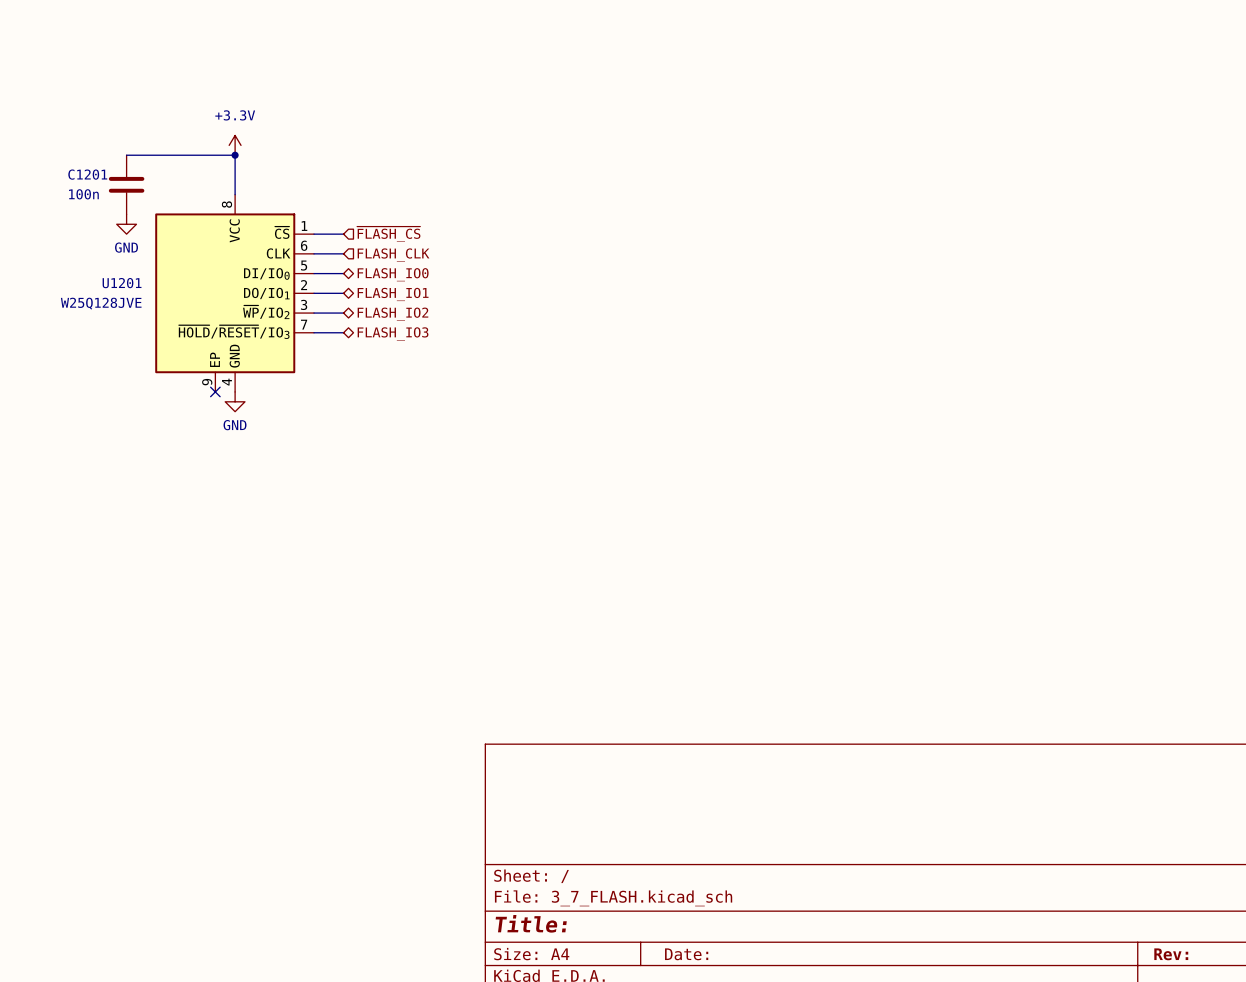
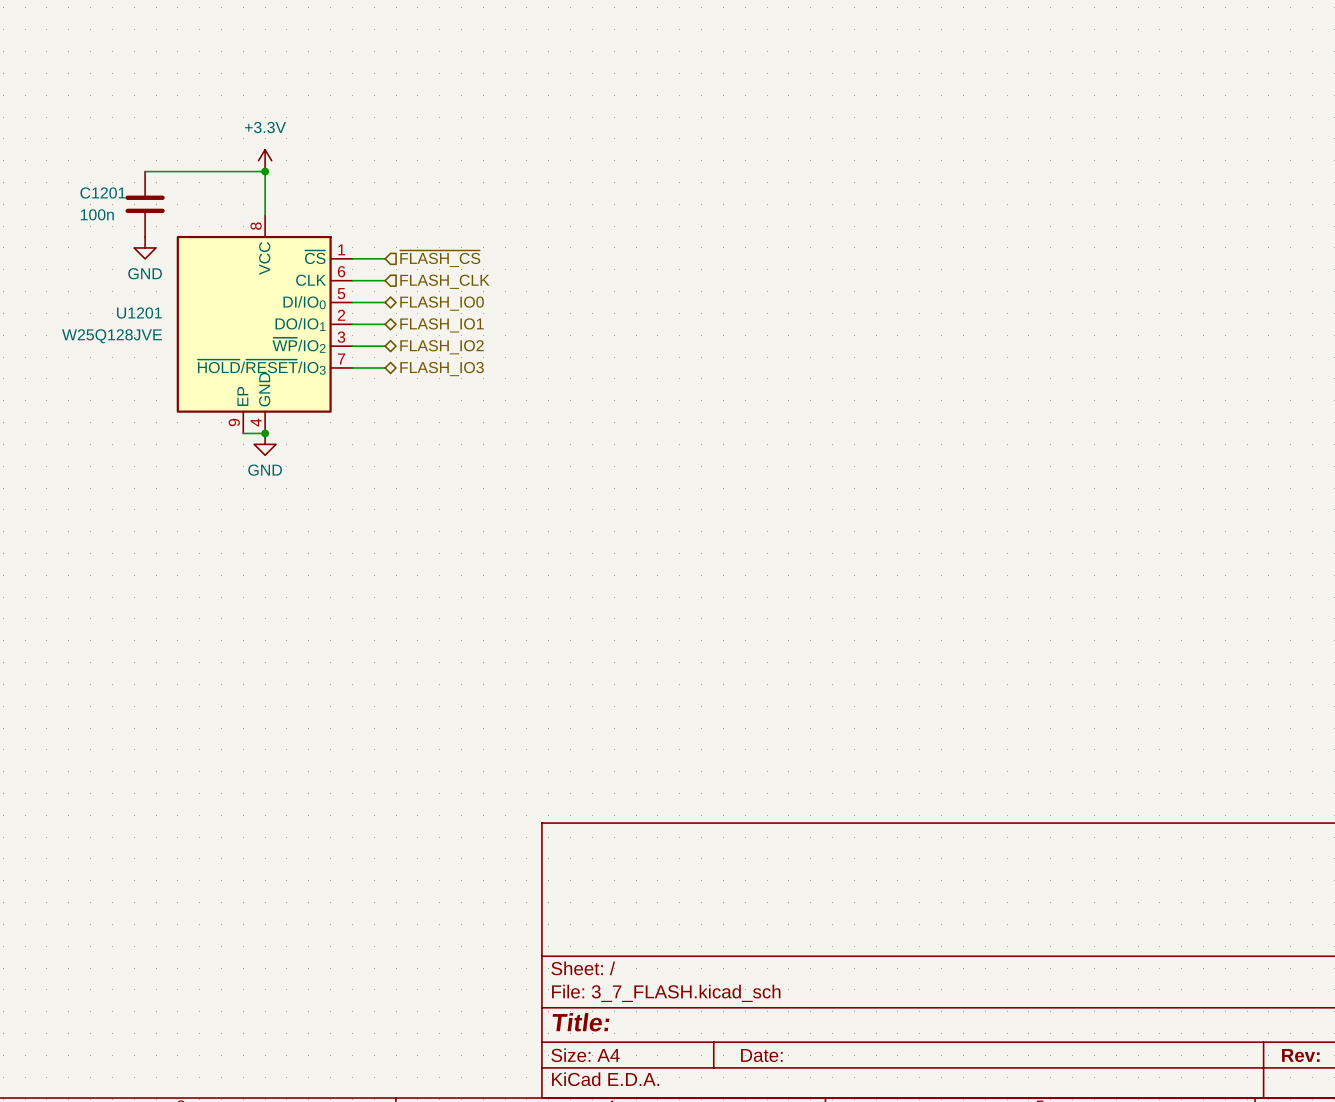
wire: none -> (243, 433) (265, 433)
no-connect mark: (215, 391) -> none
junction: none -> (265, 433)

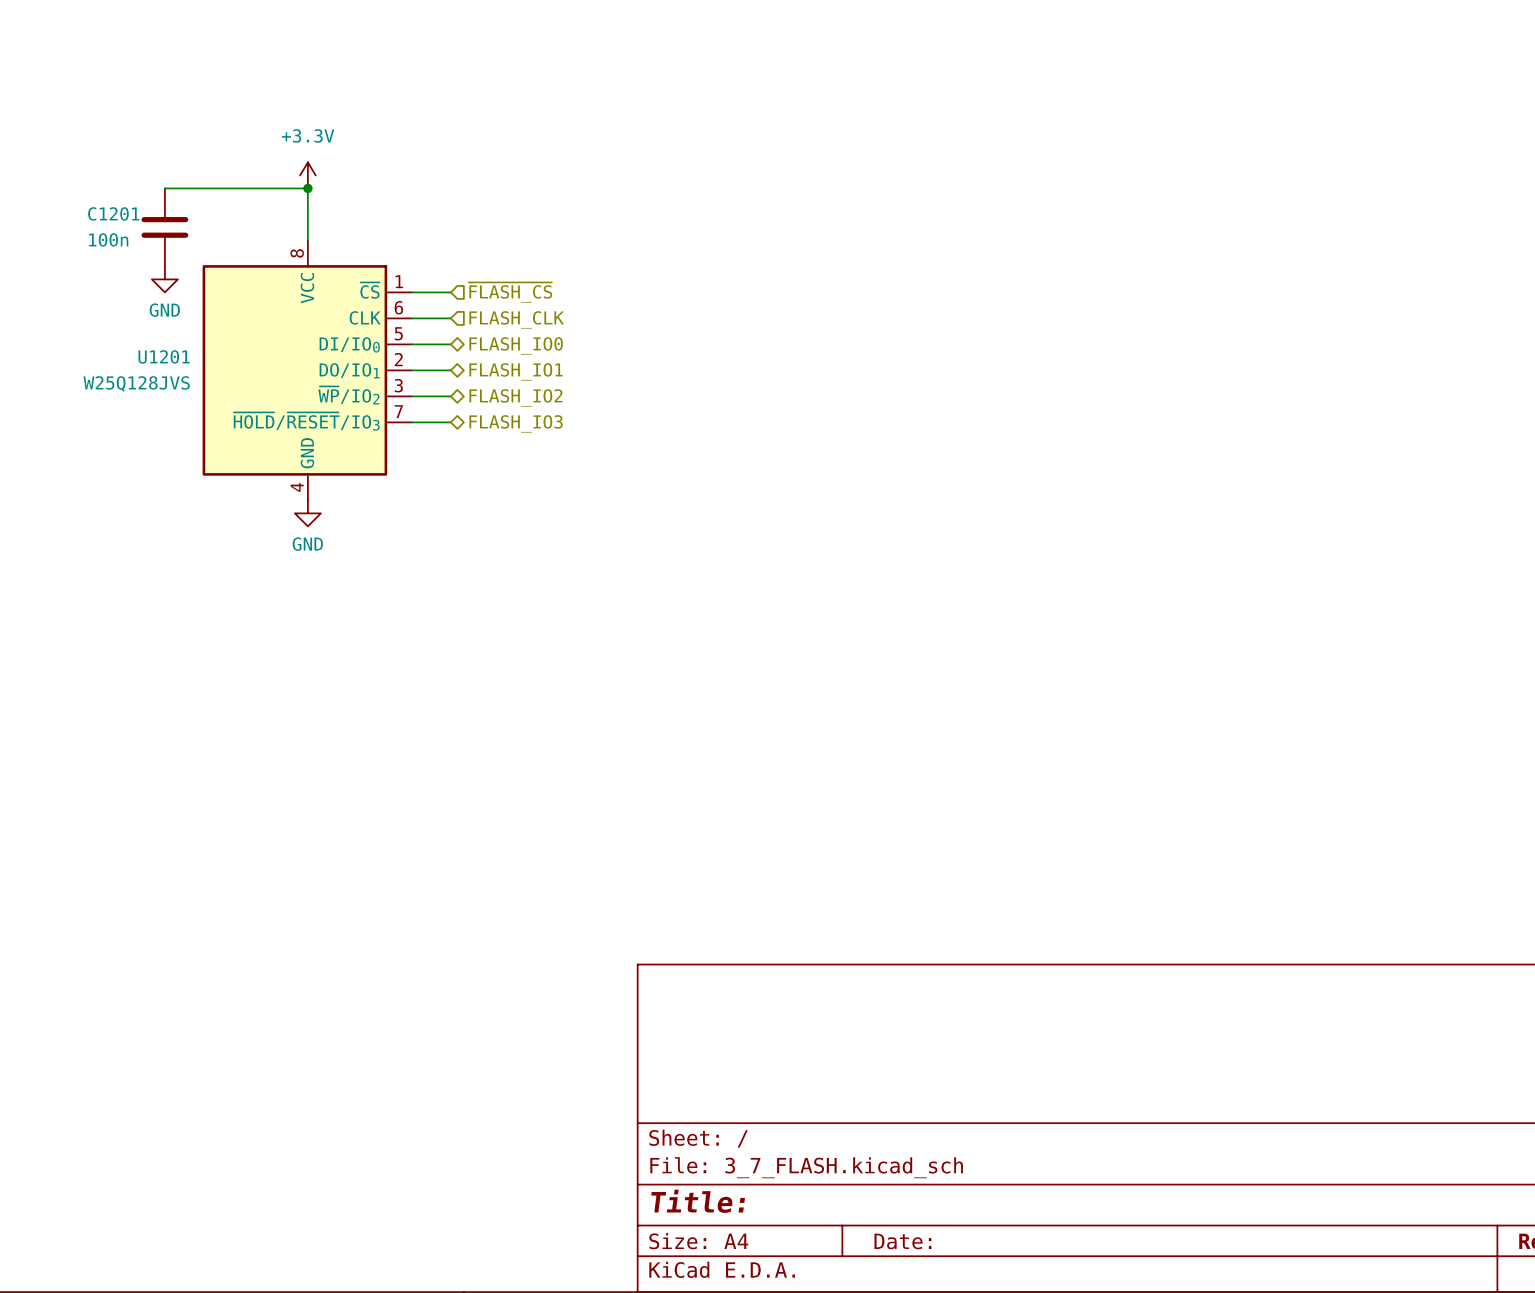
U1201 symbol: [176, 215, 353, 434] -> [202, 240, 412, 501]
U1201 value: W25Q128JVE (111, 336) -> W25Q128JVS (136, 383)
wire: (243, 433) (265, 433) -> none
junction: (265, 433) -> none

